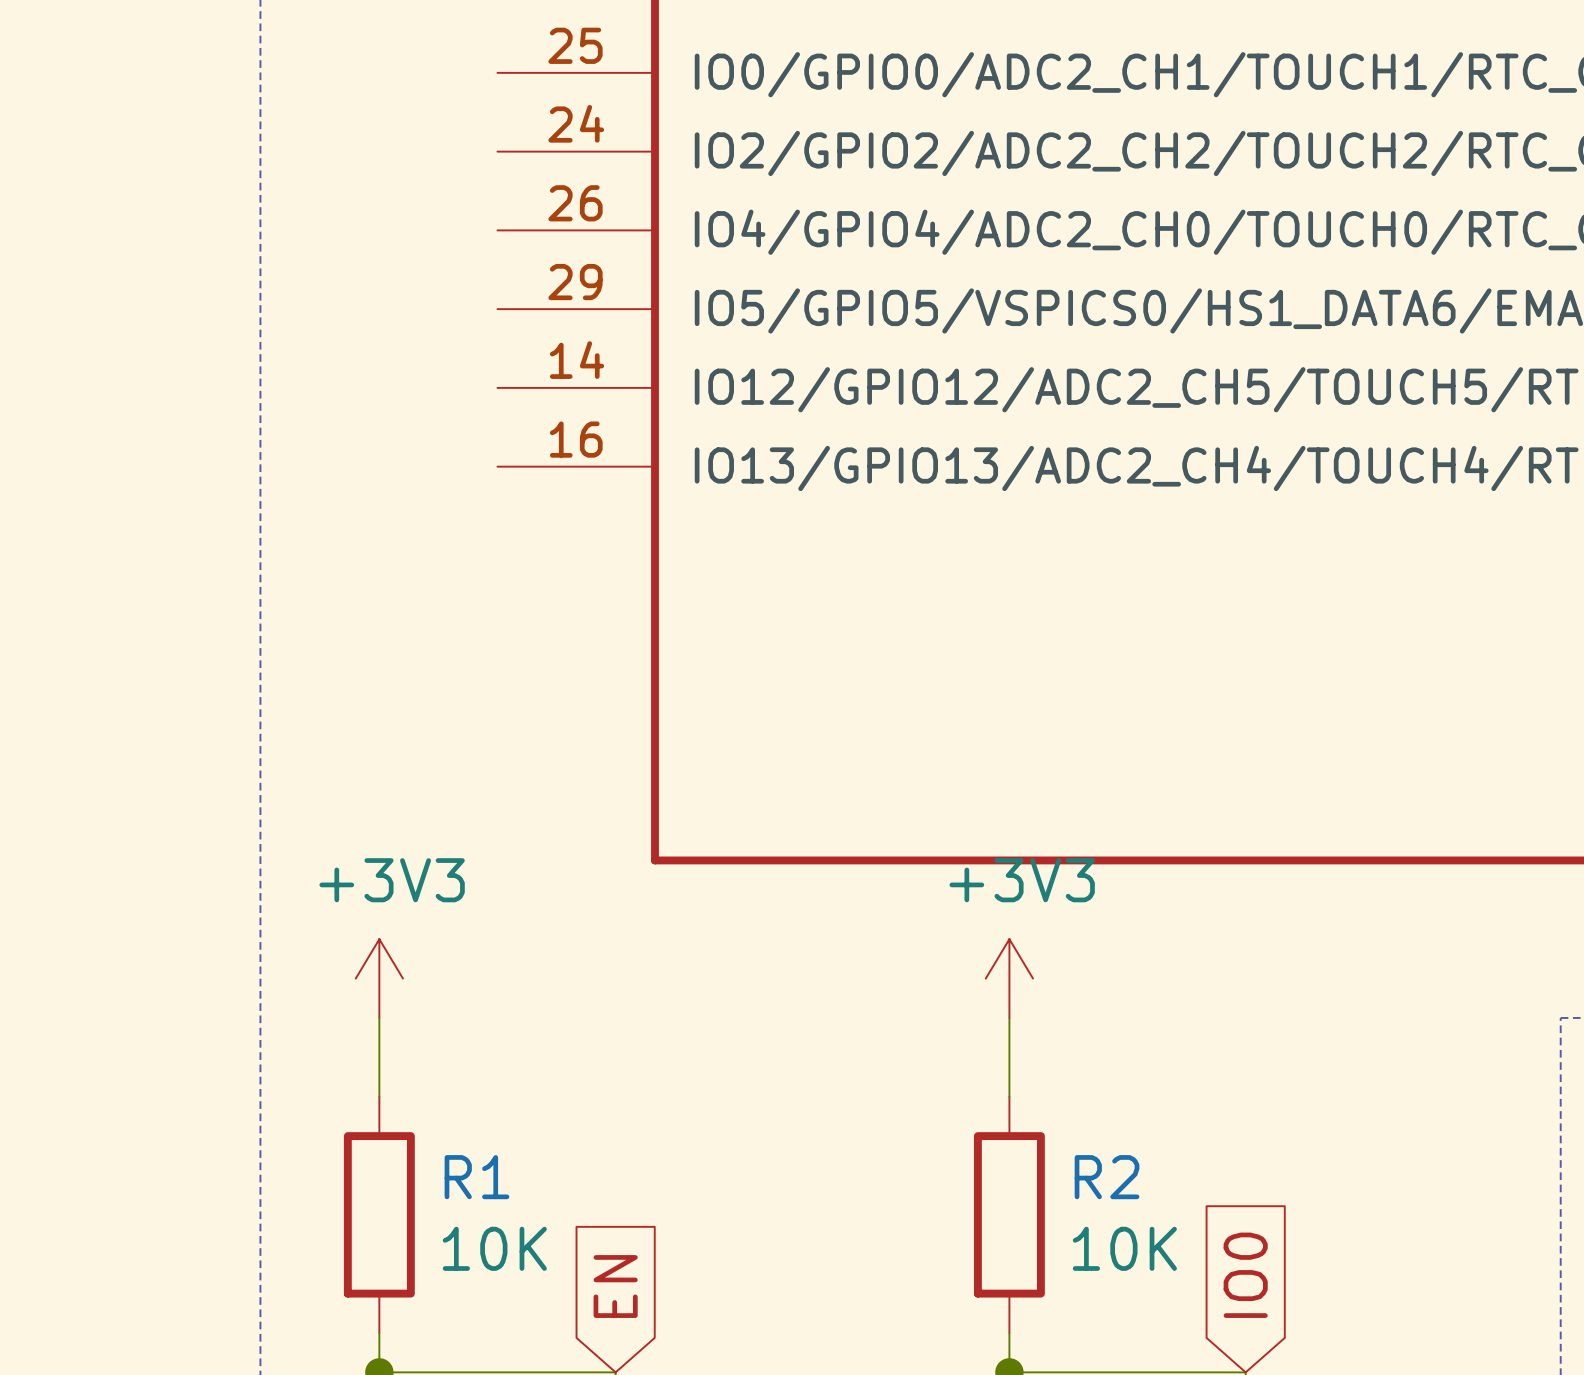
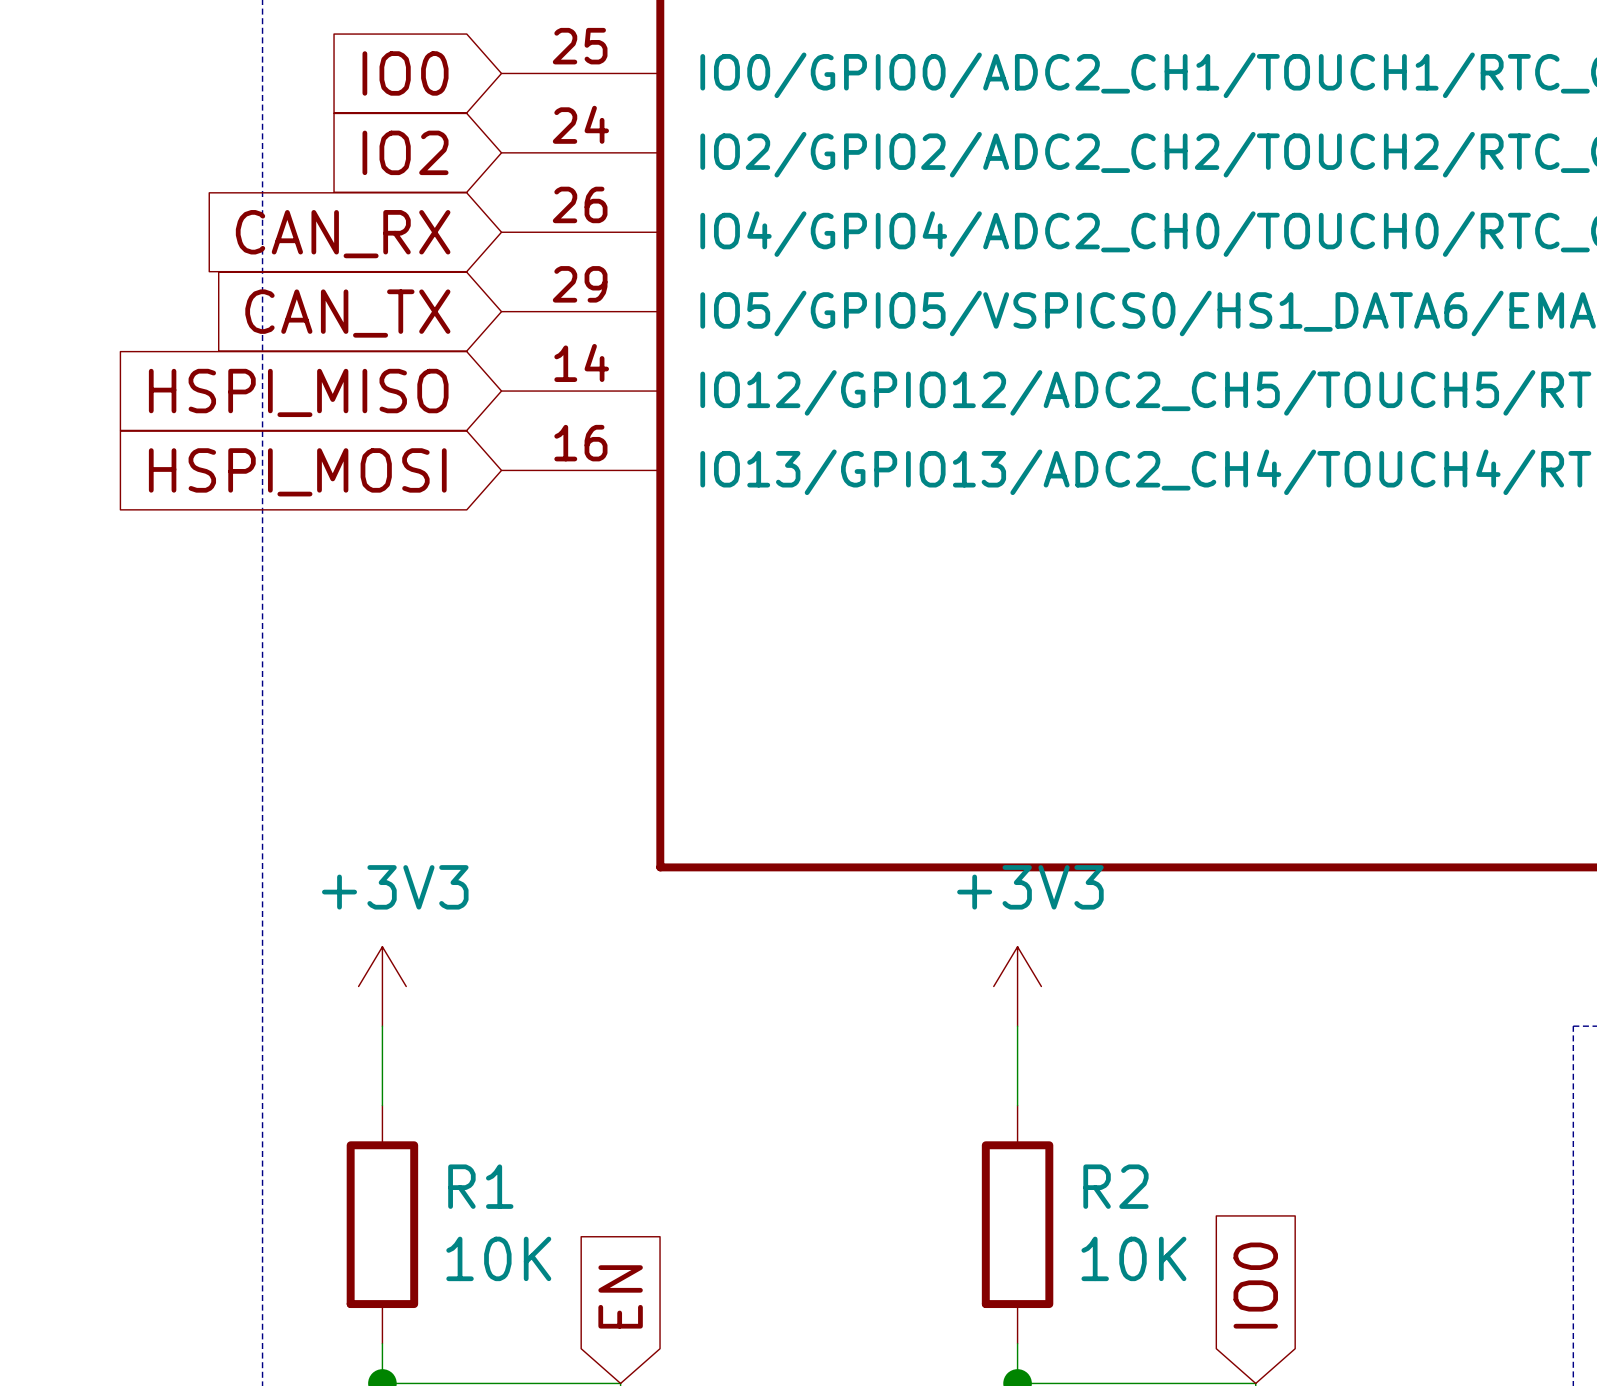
global label: none -> IO0 (405, 73)
global label: none -> IO2 (405, 152)
global label: none -> CAN_RX (343, 234)
global label: none -> CAN_TX (347, 313)
global label: none -> HSPI_MISO (298, 392)
global label: none -> HSPI_MOSI (297, 472)

